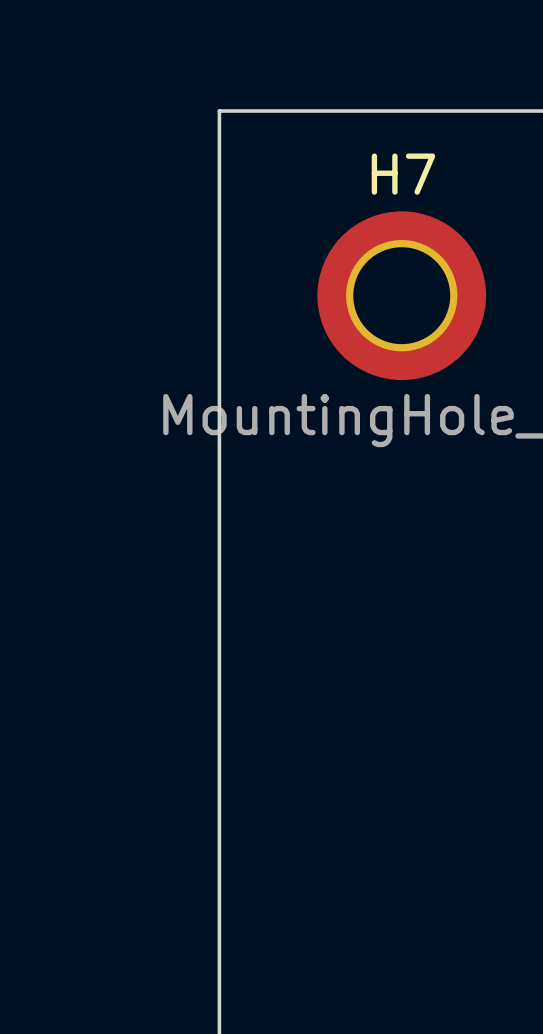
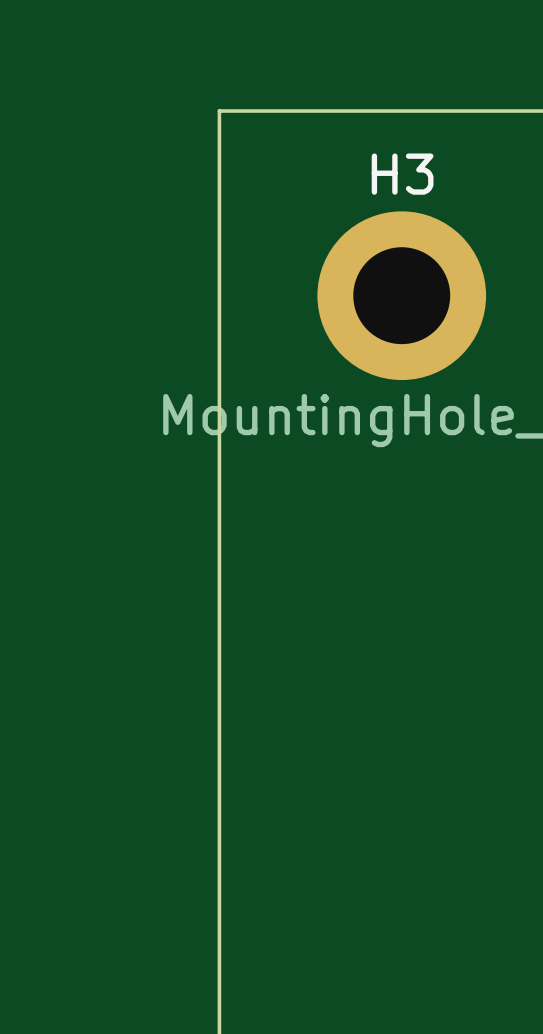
H7 name: H7 (403, 174) -> H3 (402, 174)

